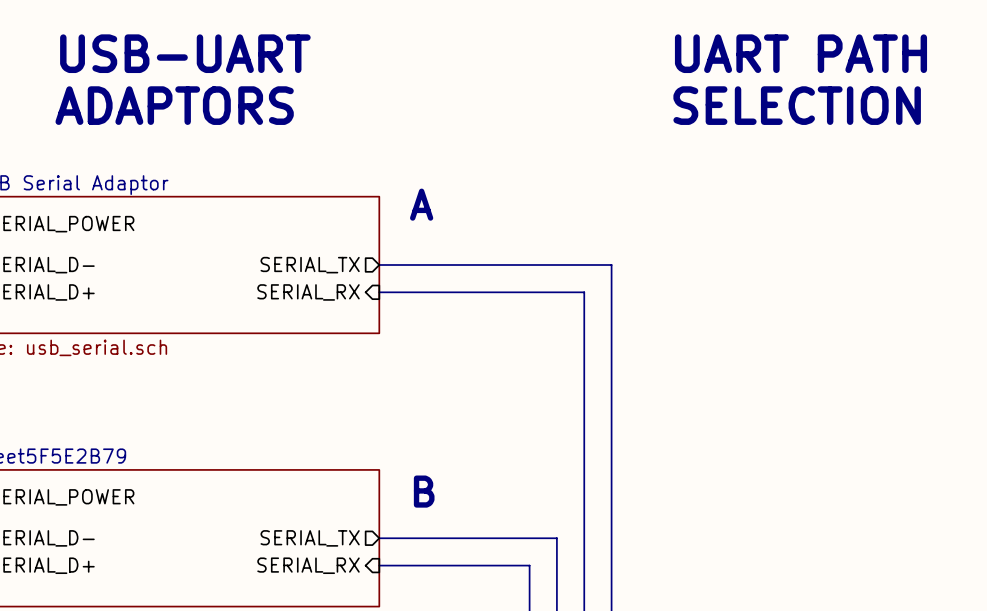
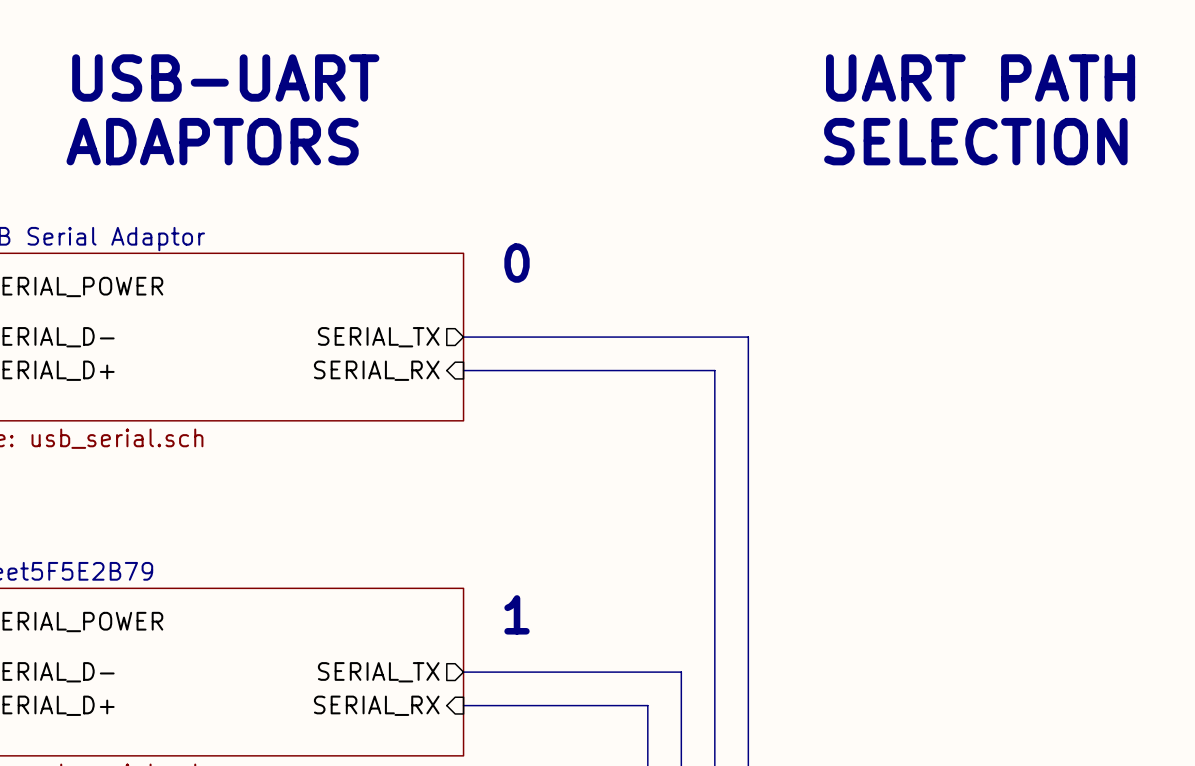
text: A (421, 204) -> 0 (517, 263)
text: B (424, 491) -> 1 (517, 614)

